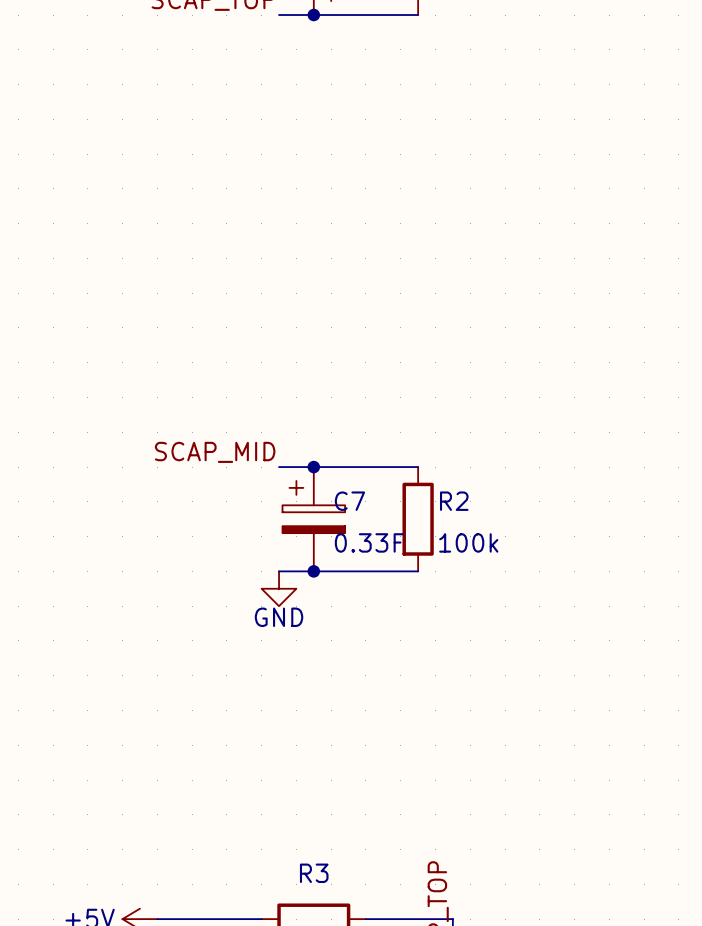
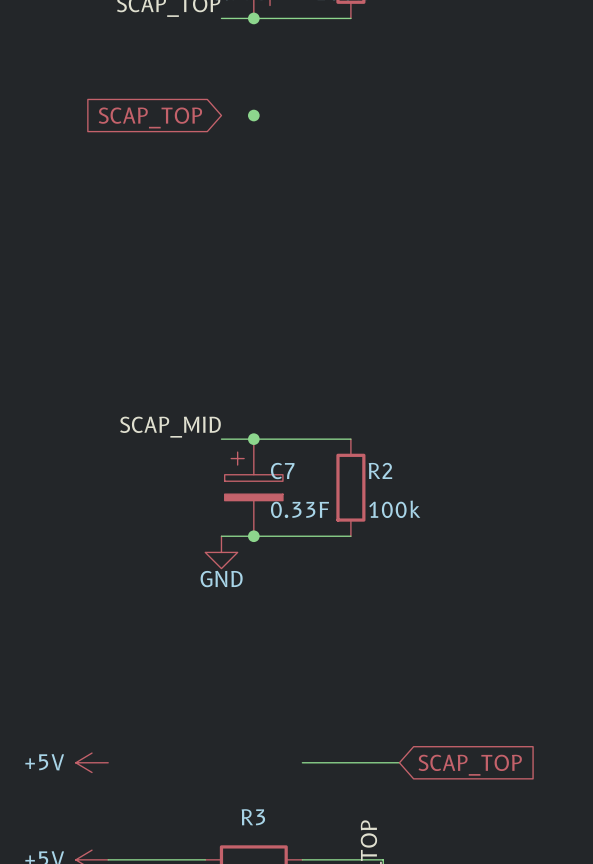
junction: none -> (253, 115)
global label: none -> SCAP_TOP (150, 117)
power symbol: none -> +5V (92, 762)
wire: none -> (302, 762) (399, 762)
global label: none -> SCAP_TOP (470, 765)

